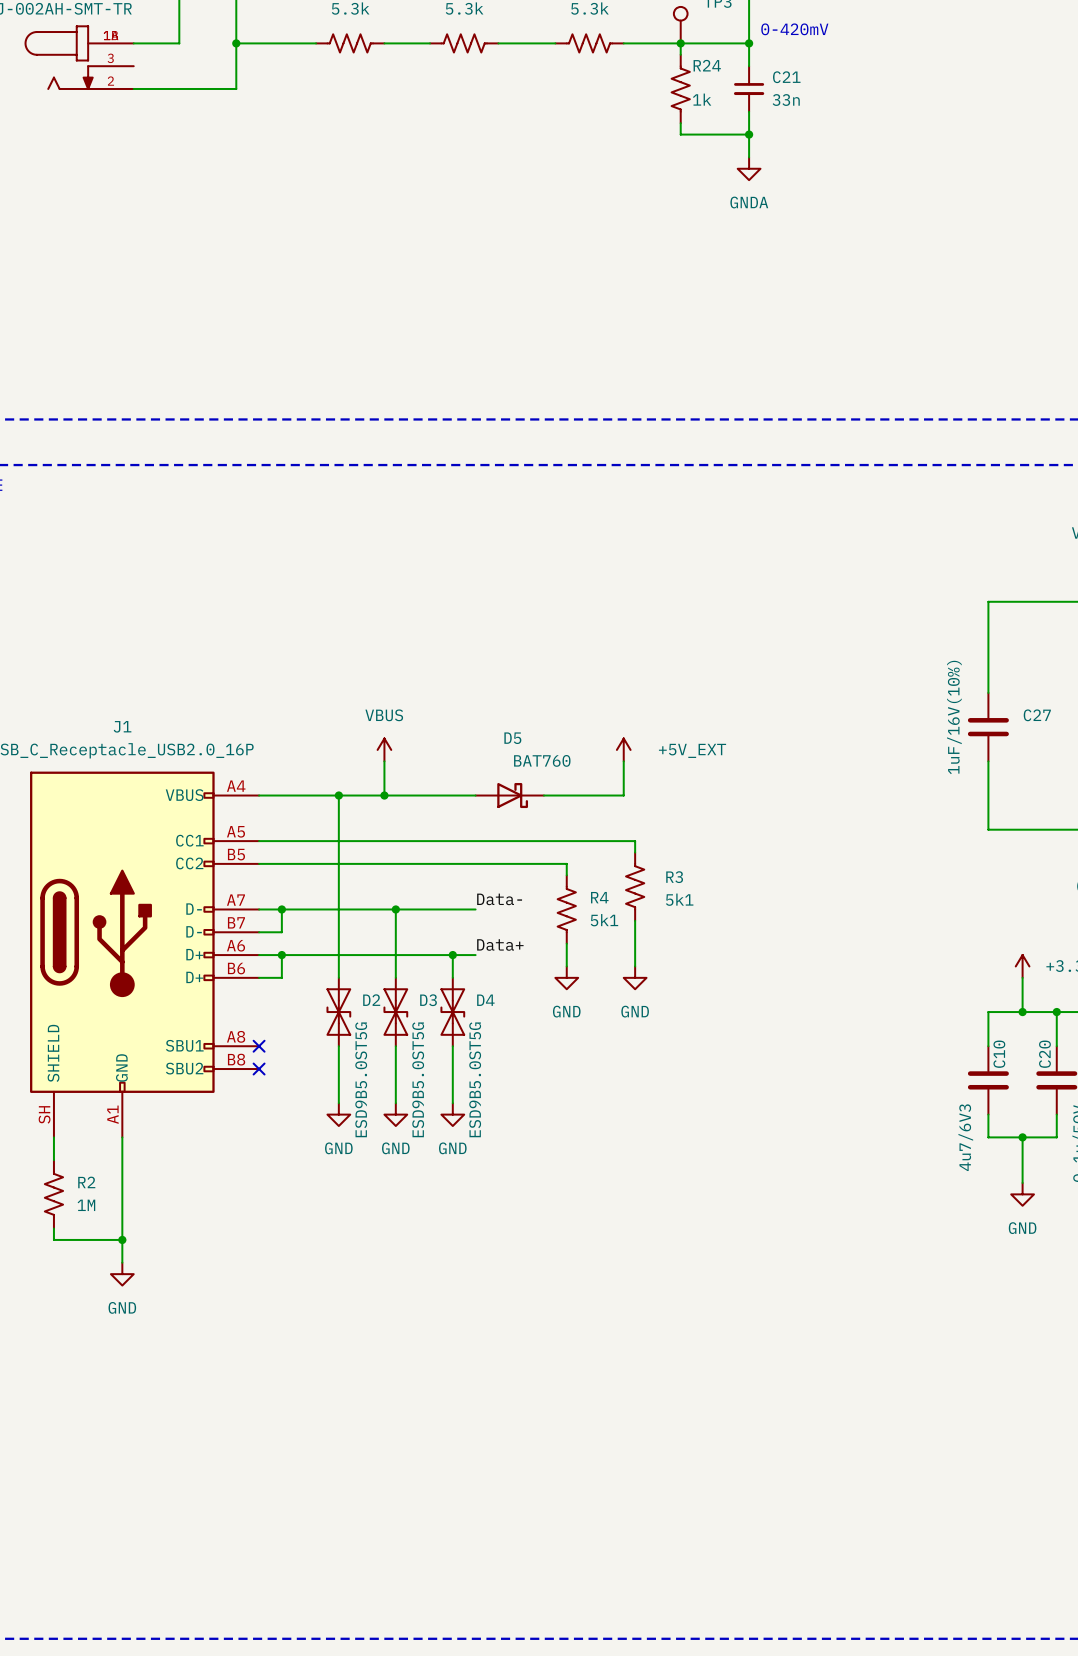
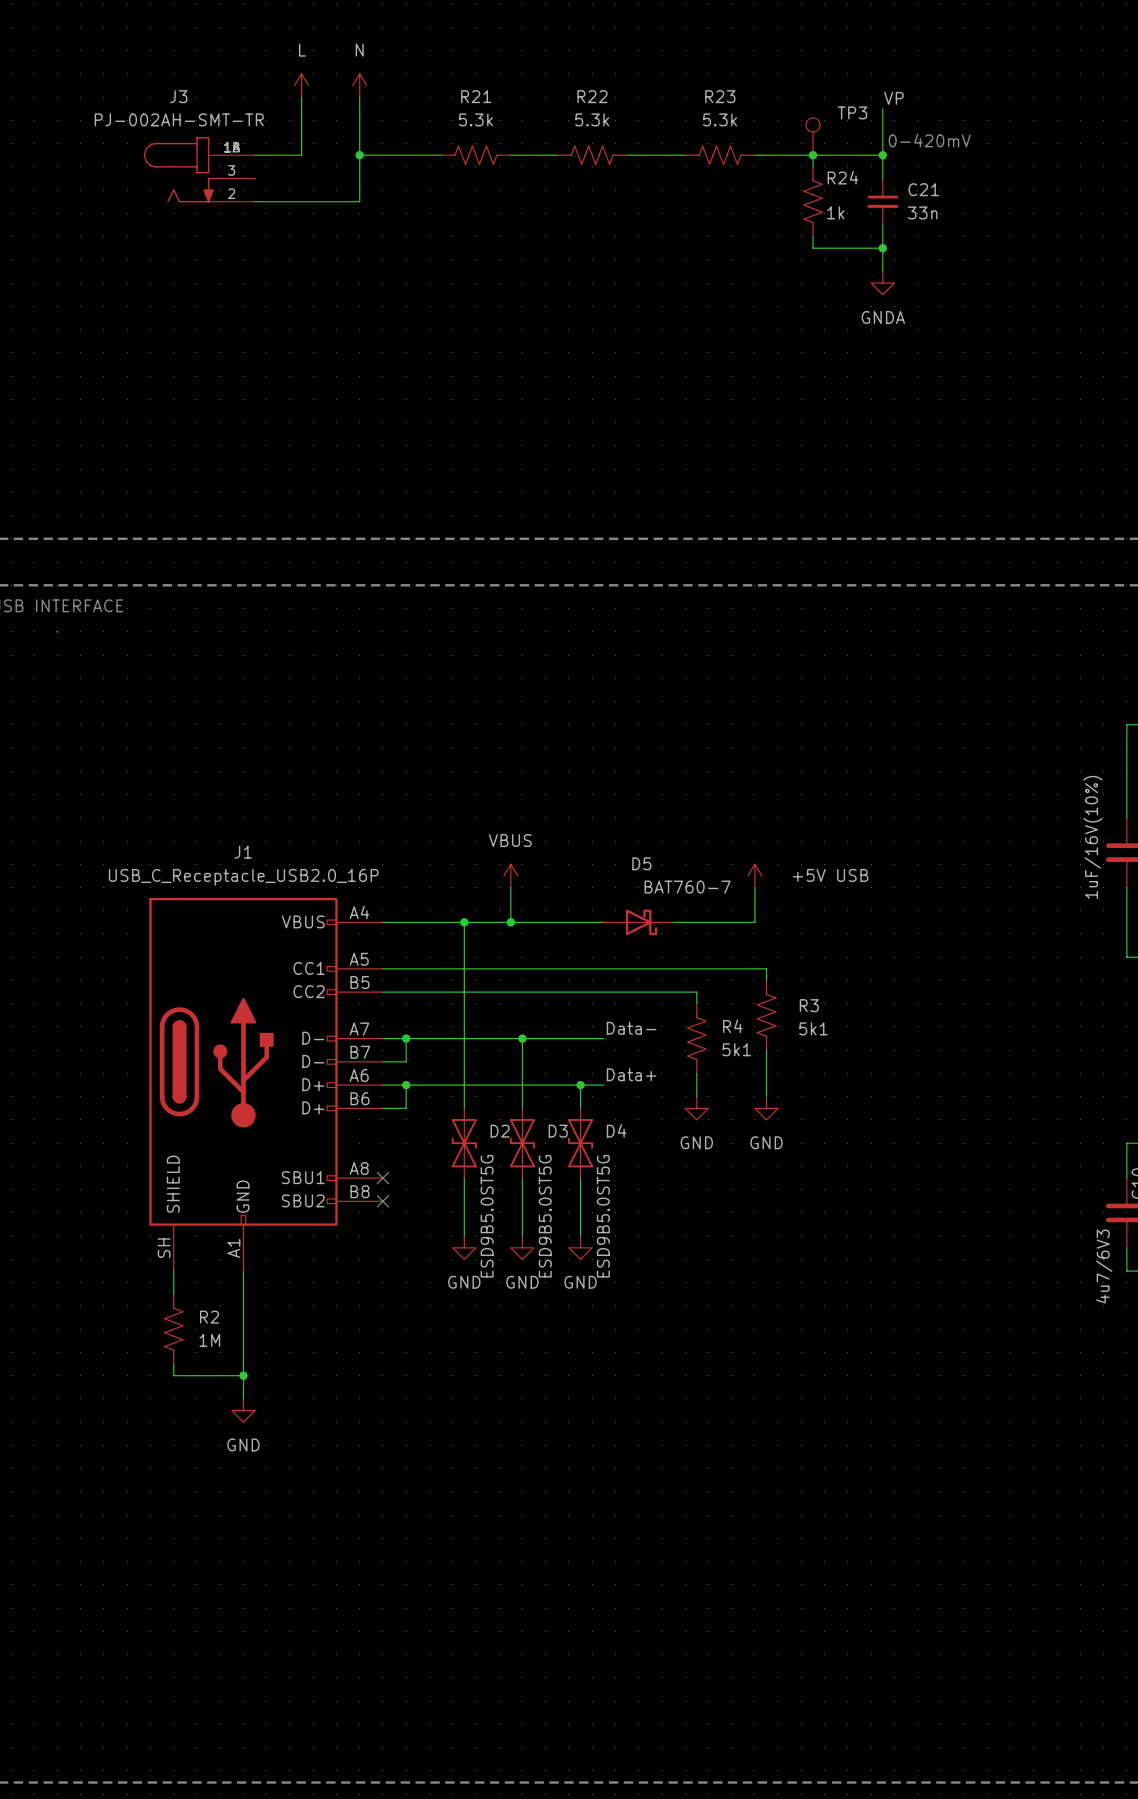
power symbol: +5V_EXT (623, 749) -> +5V USB (754, 875)
D5 value: BAT760 (542, 760) -> BAT760-7 (687, 887)

